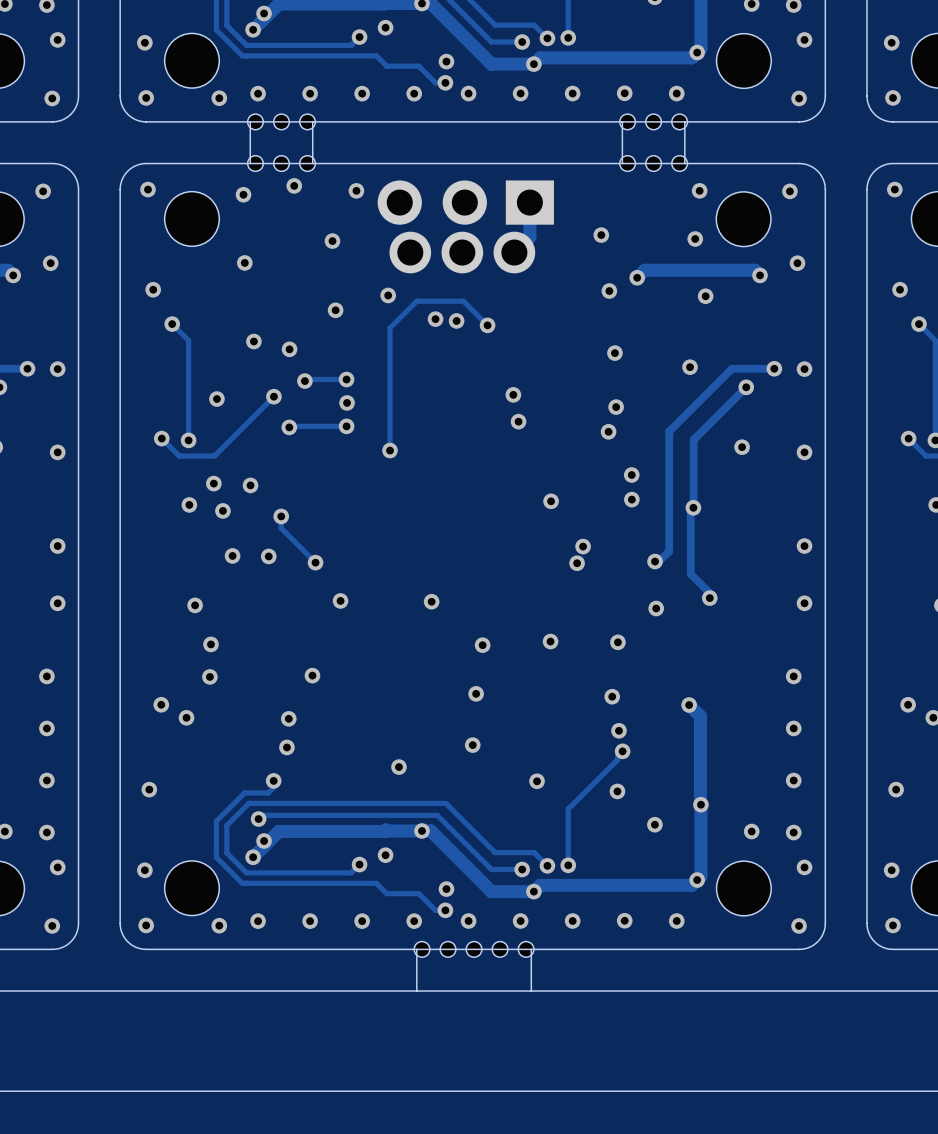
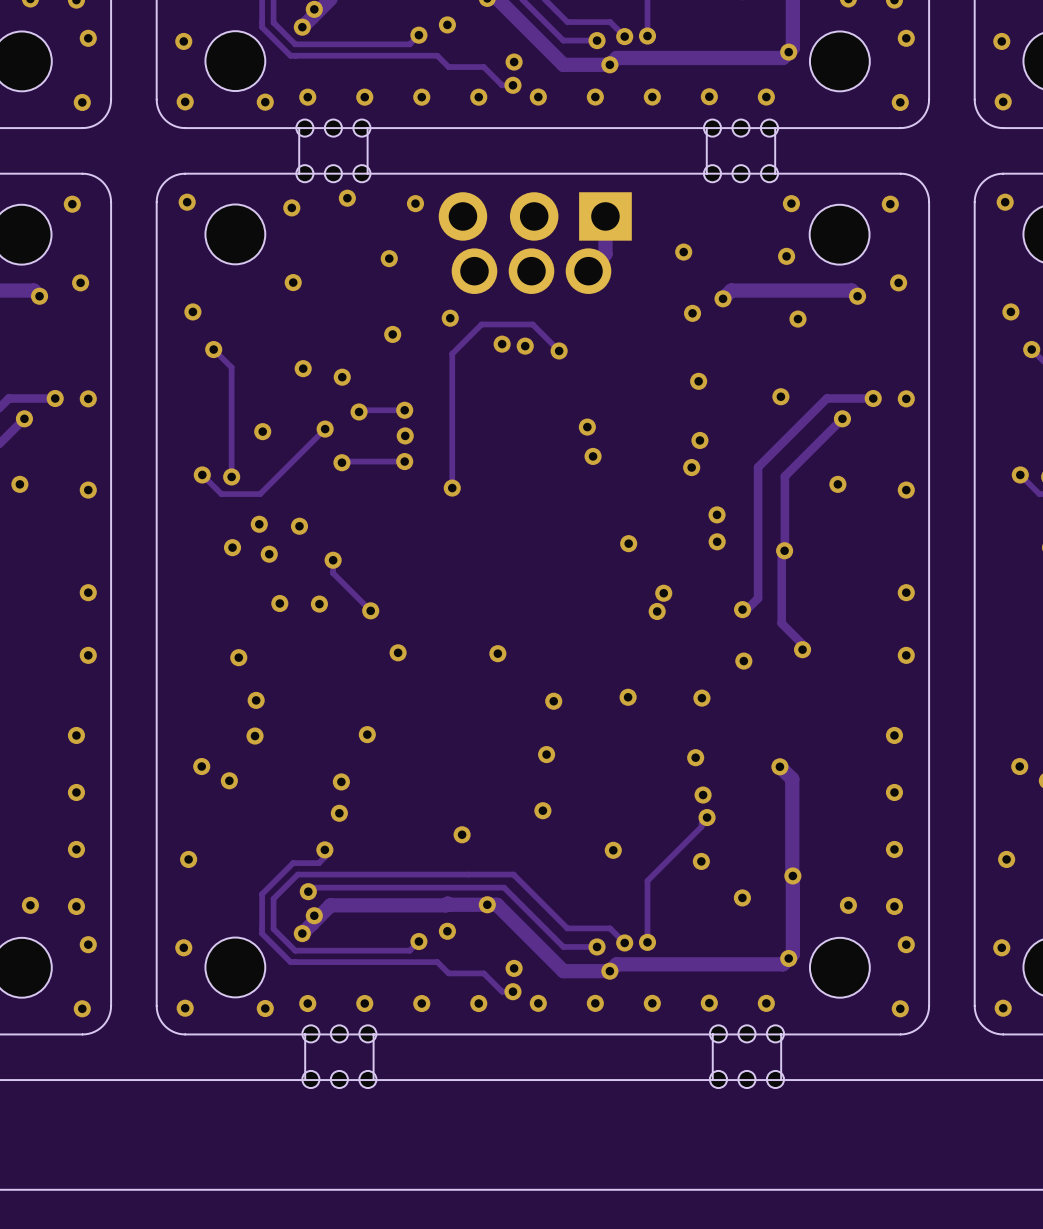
board edge: none -> (305, 1033) (305, 1079)
part: none -> (310, 1033)
part: none -> (339, 1033)
part: none -> (367, 1033)
part: none -> (718, 1033)
part: none -> (746, 1033)
part: none -> (775, 1033)
board edge: none -> (781, 1033) (781, 1079)
board edge: (416, 949) (416, 991) -> (373, 1033) (373, 1079)
part: (422, 949) -> none
part: (448, 949) -> none
part: (474, 949) -> none
part: (500, 949) -> none
part: (526, 949) -> none
board edge: (531, 949) (531, 991) -> (712, 1033) (712, 1079)
part: none -> (310, 1079)
part: none -> (339, 1079)
part: none -> (367, 1079)
part: none -> (718, 1079)
part: none -> (746, 1079)
part: none -> (775, 1079)

